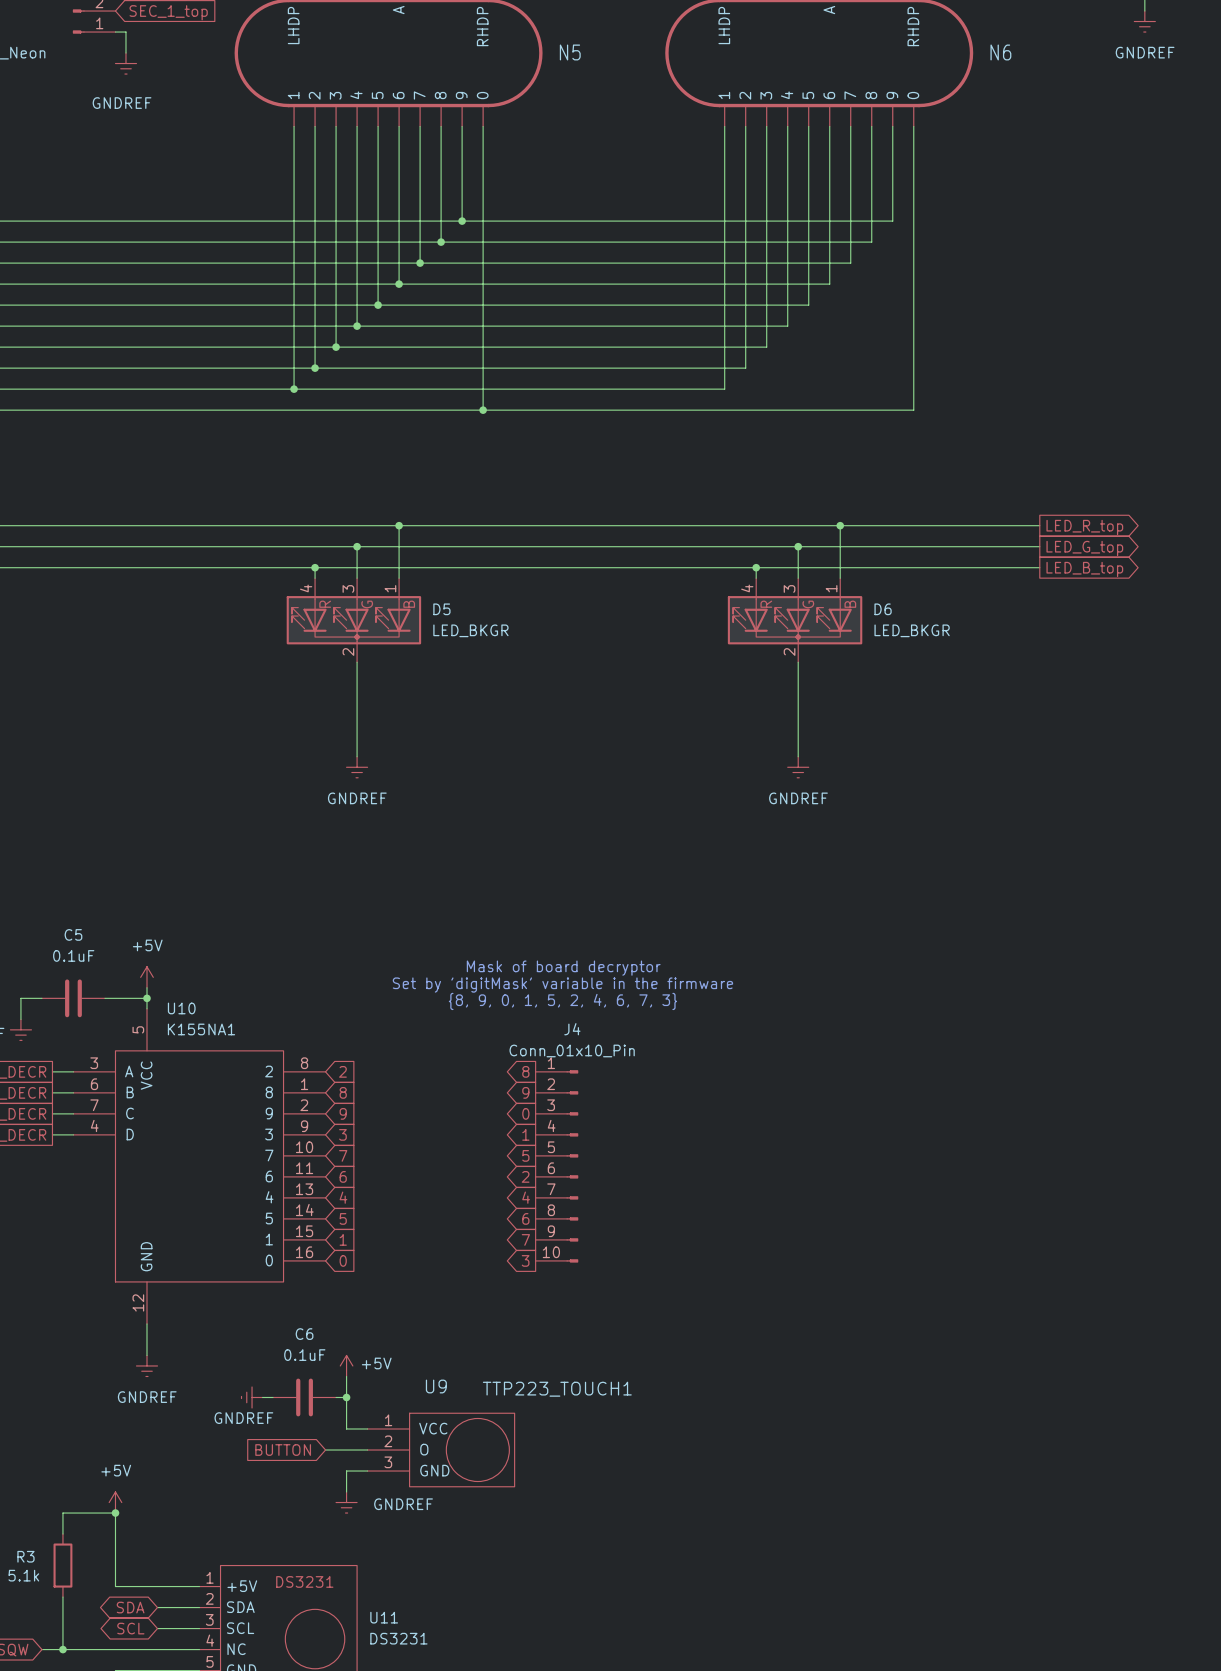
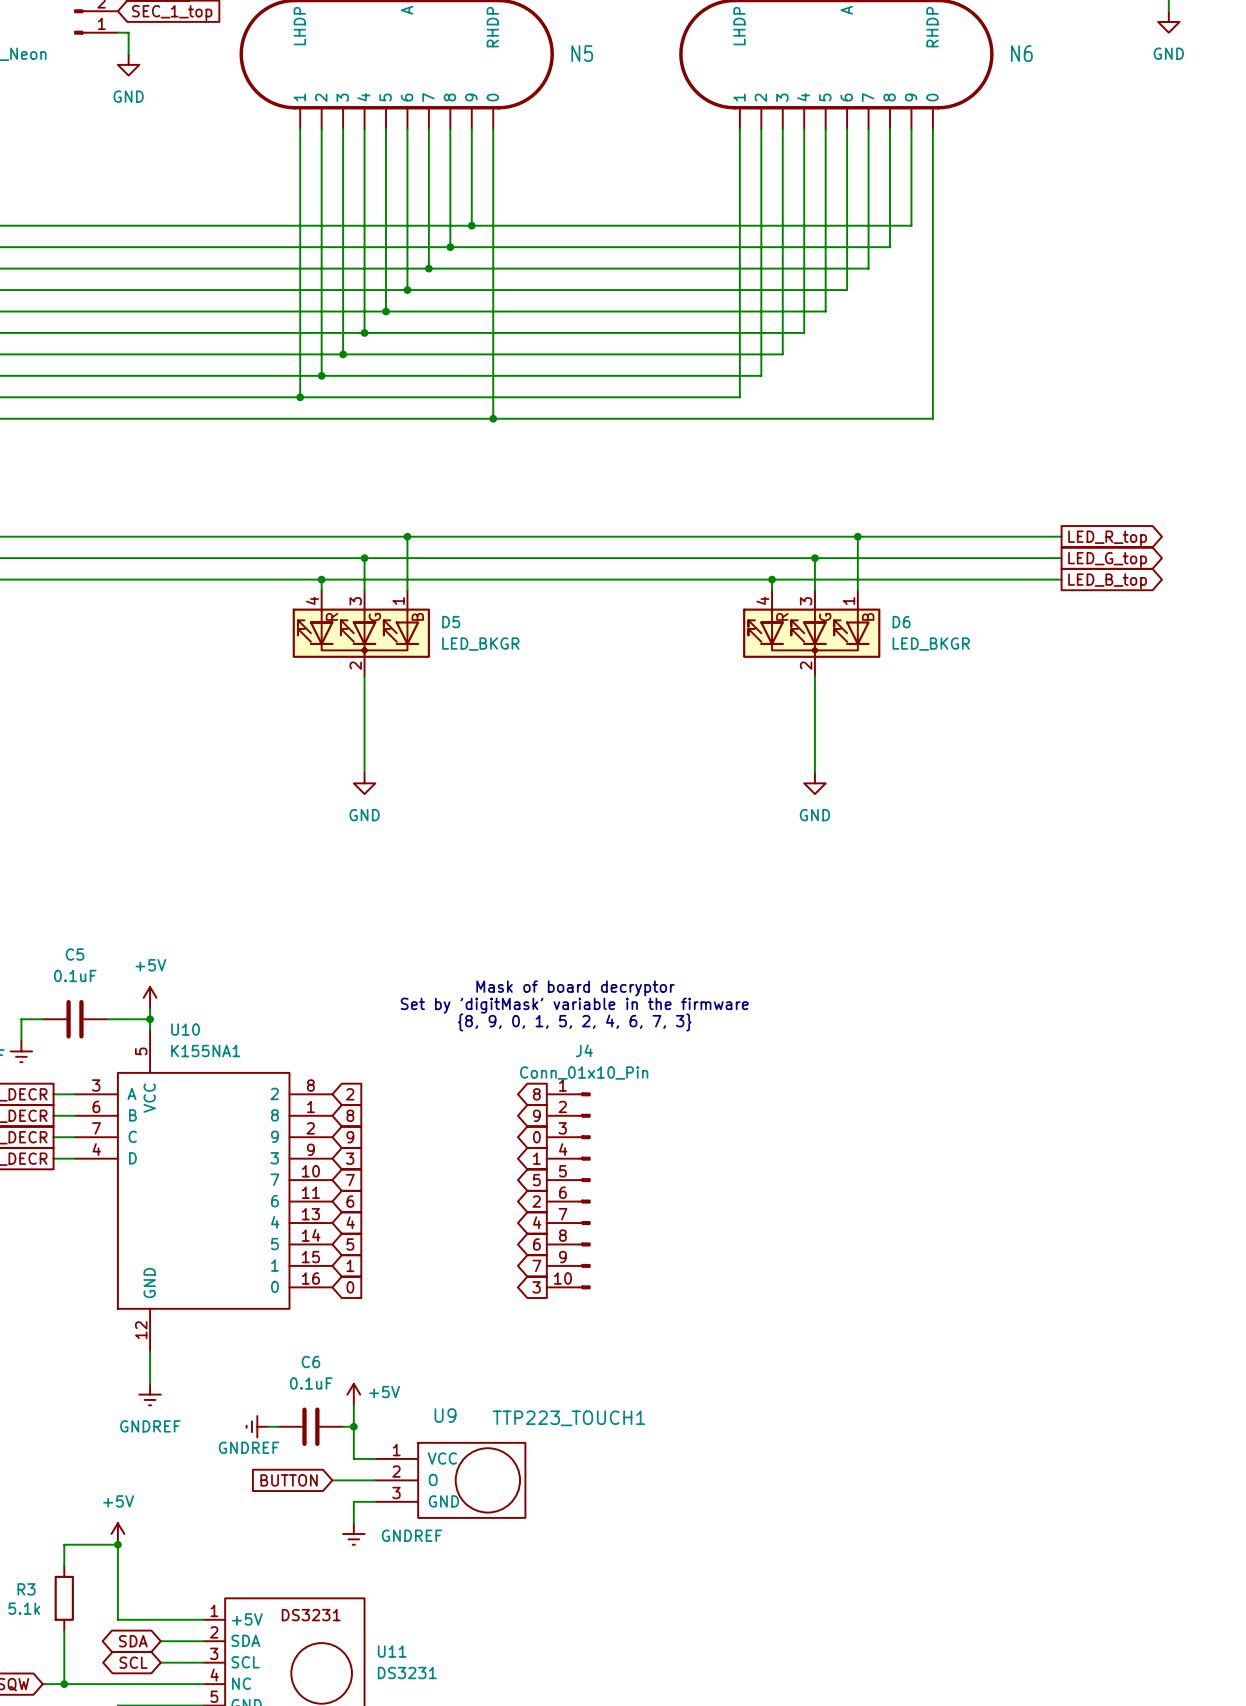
power symbol: GNDREF (1144, 21) -> GND (1168, 21)
power symbol: GNDREF (125, 63) -> GND (128, 64)
power symbol: GNDREF (357, 767) -> GND (364, 783)
power symbol: GNDREF (798, 767) -> GND (814, 783)

